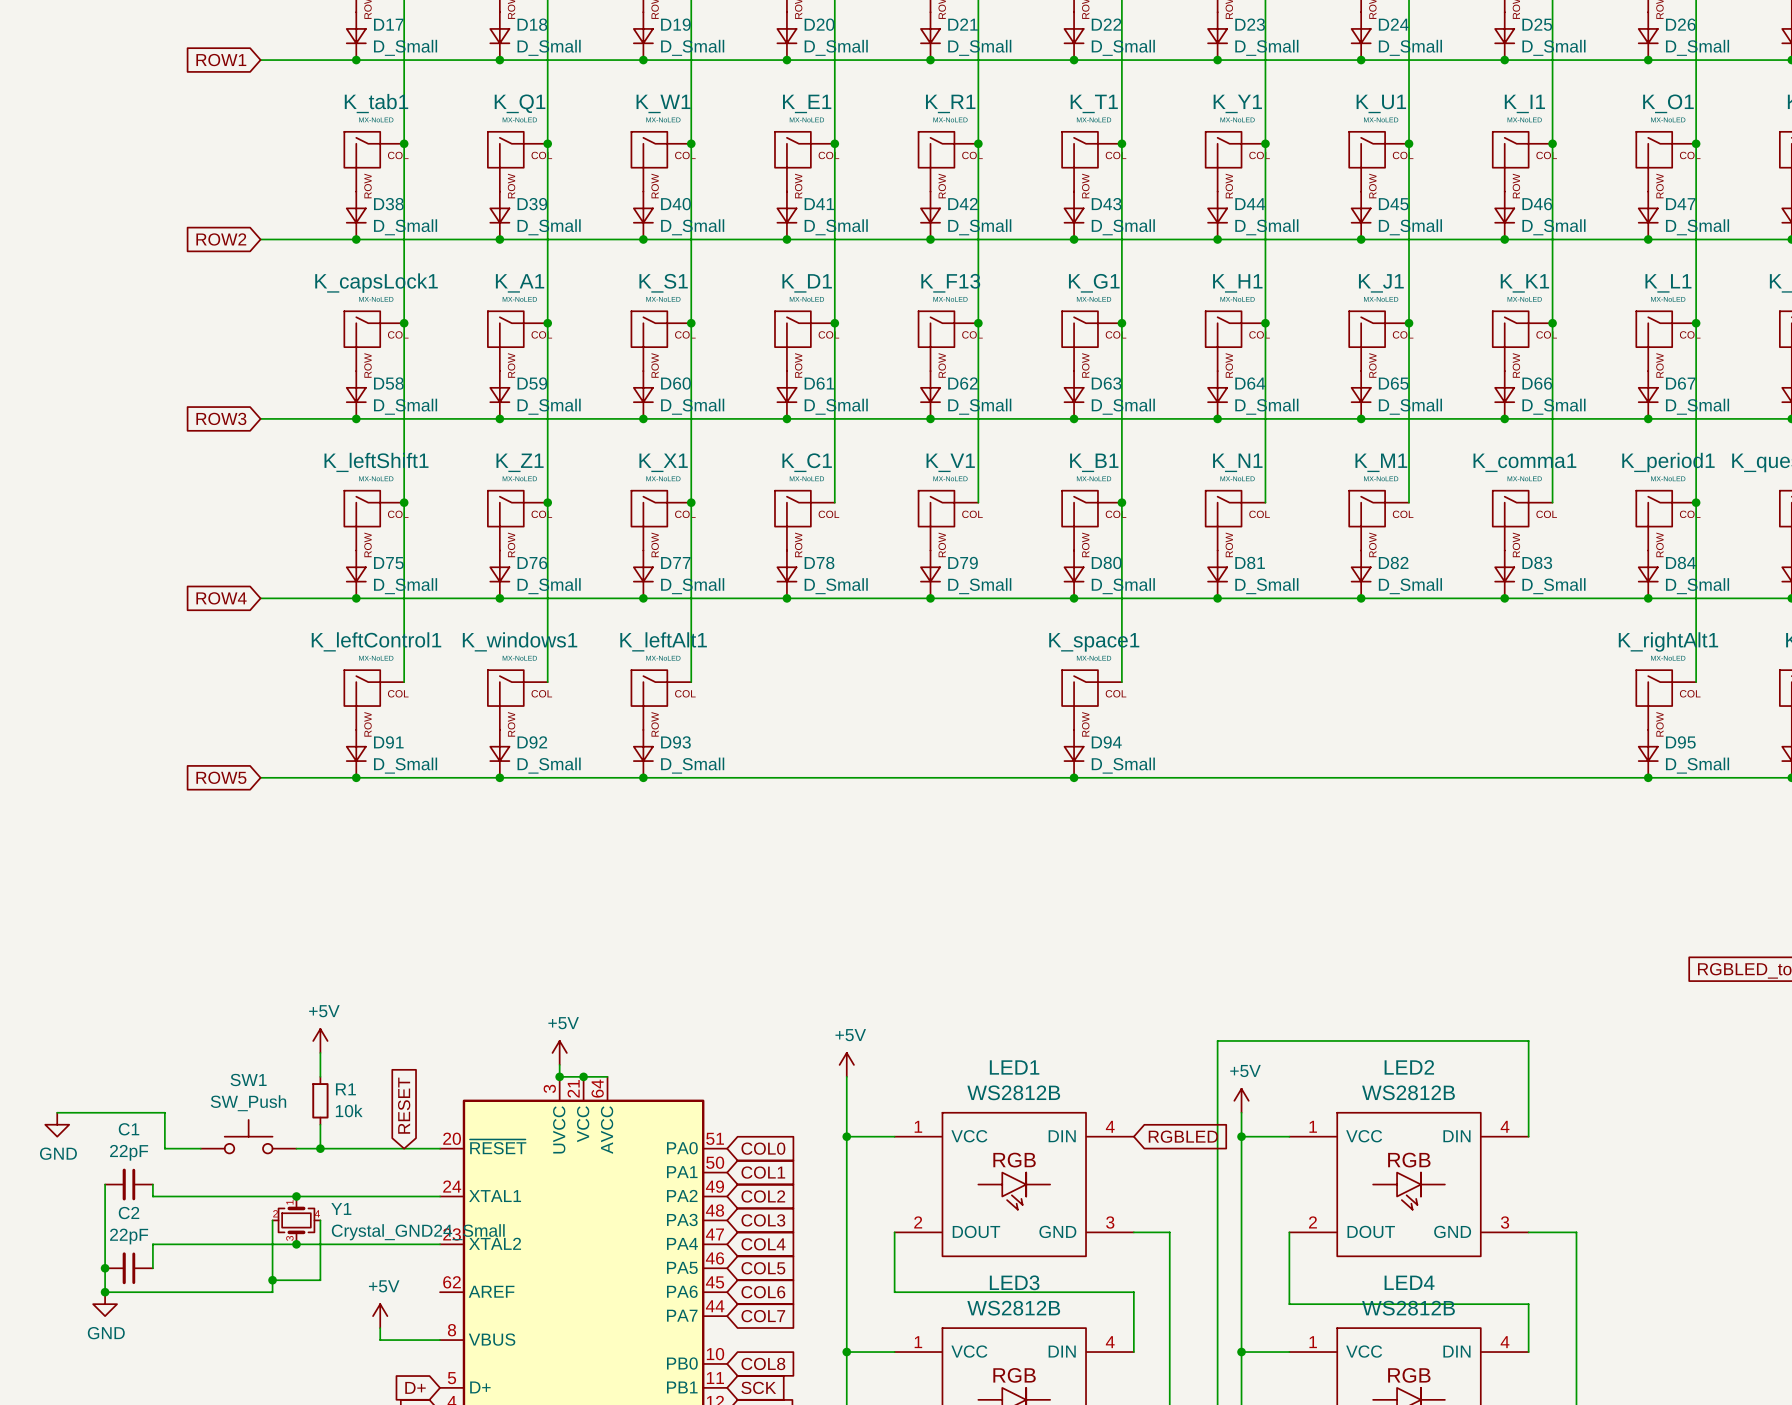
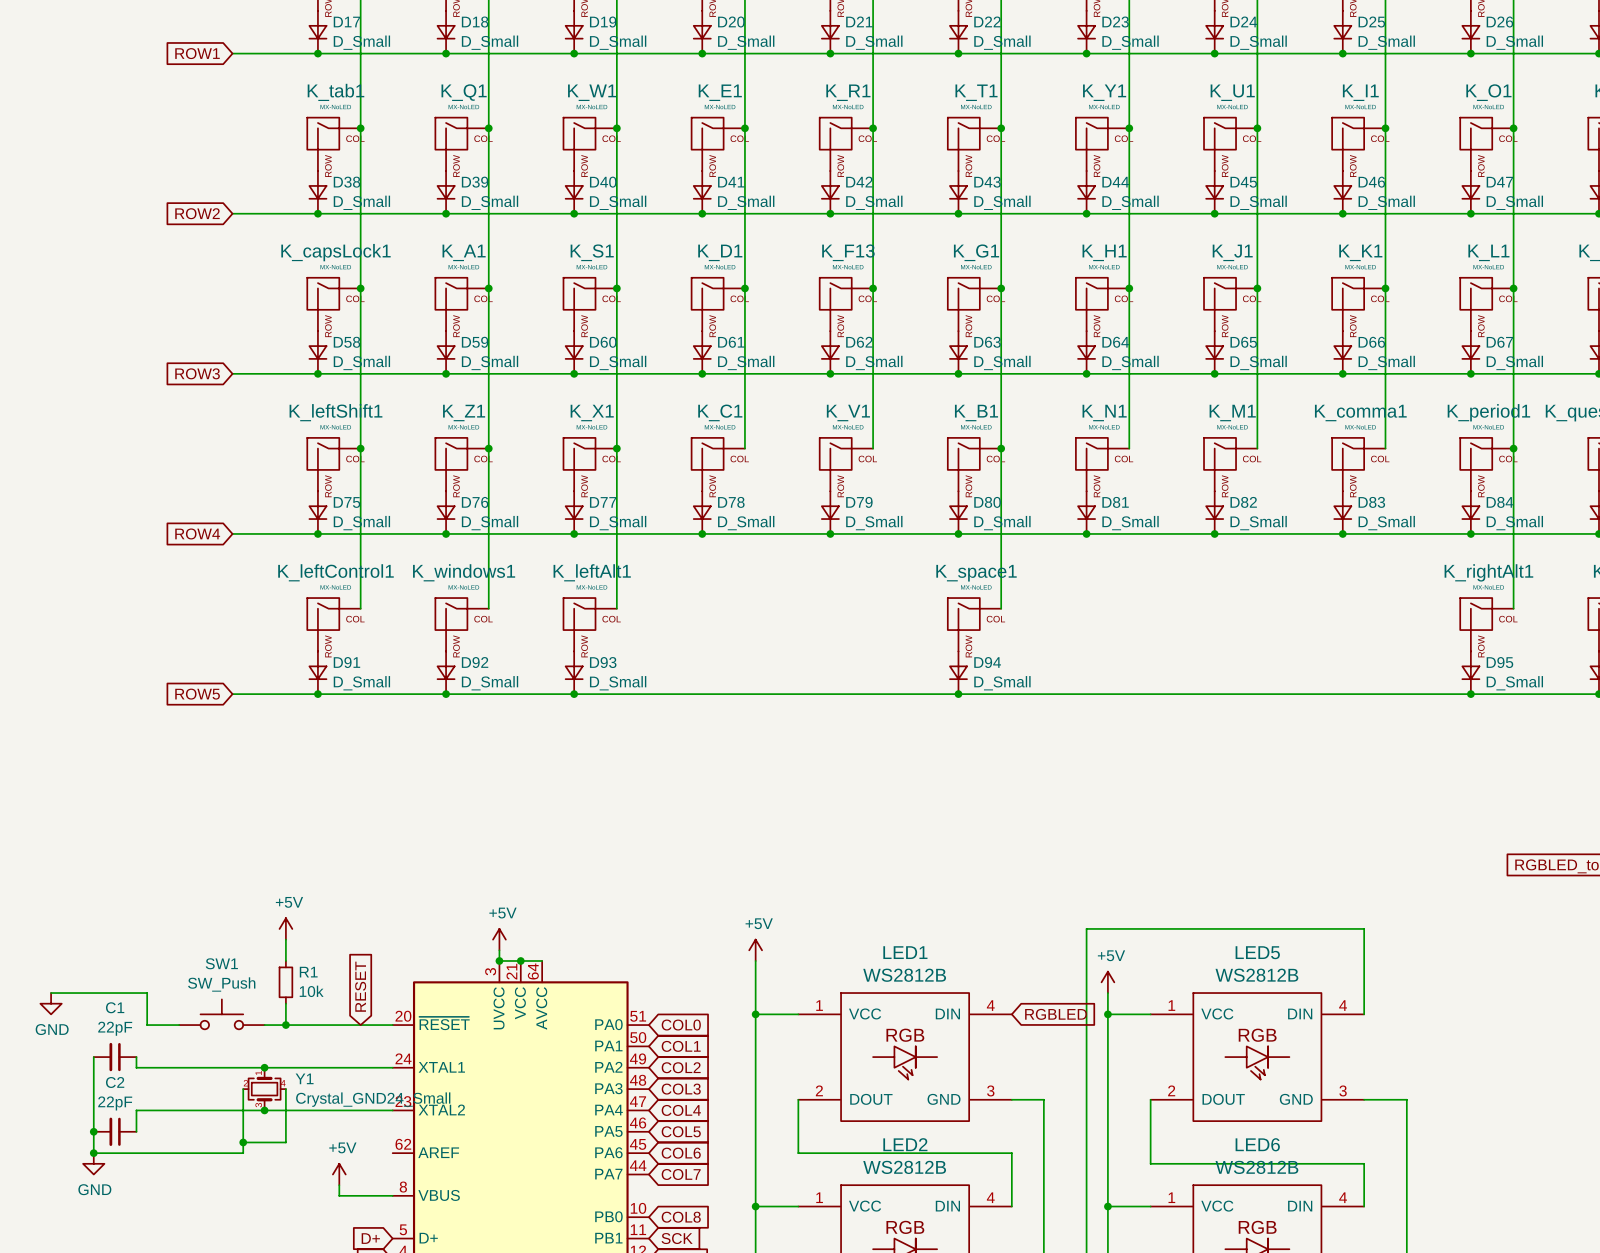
LED2 name: LED2 (1409, 1067) -> LED5 (1257, 952)
LED3 name: LED3 (1014, 1282) -> LED2 (905, 1144)
LED4 name: LED4 (1409, 1282) -> LED6 (1257, 1144)

